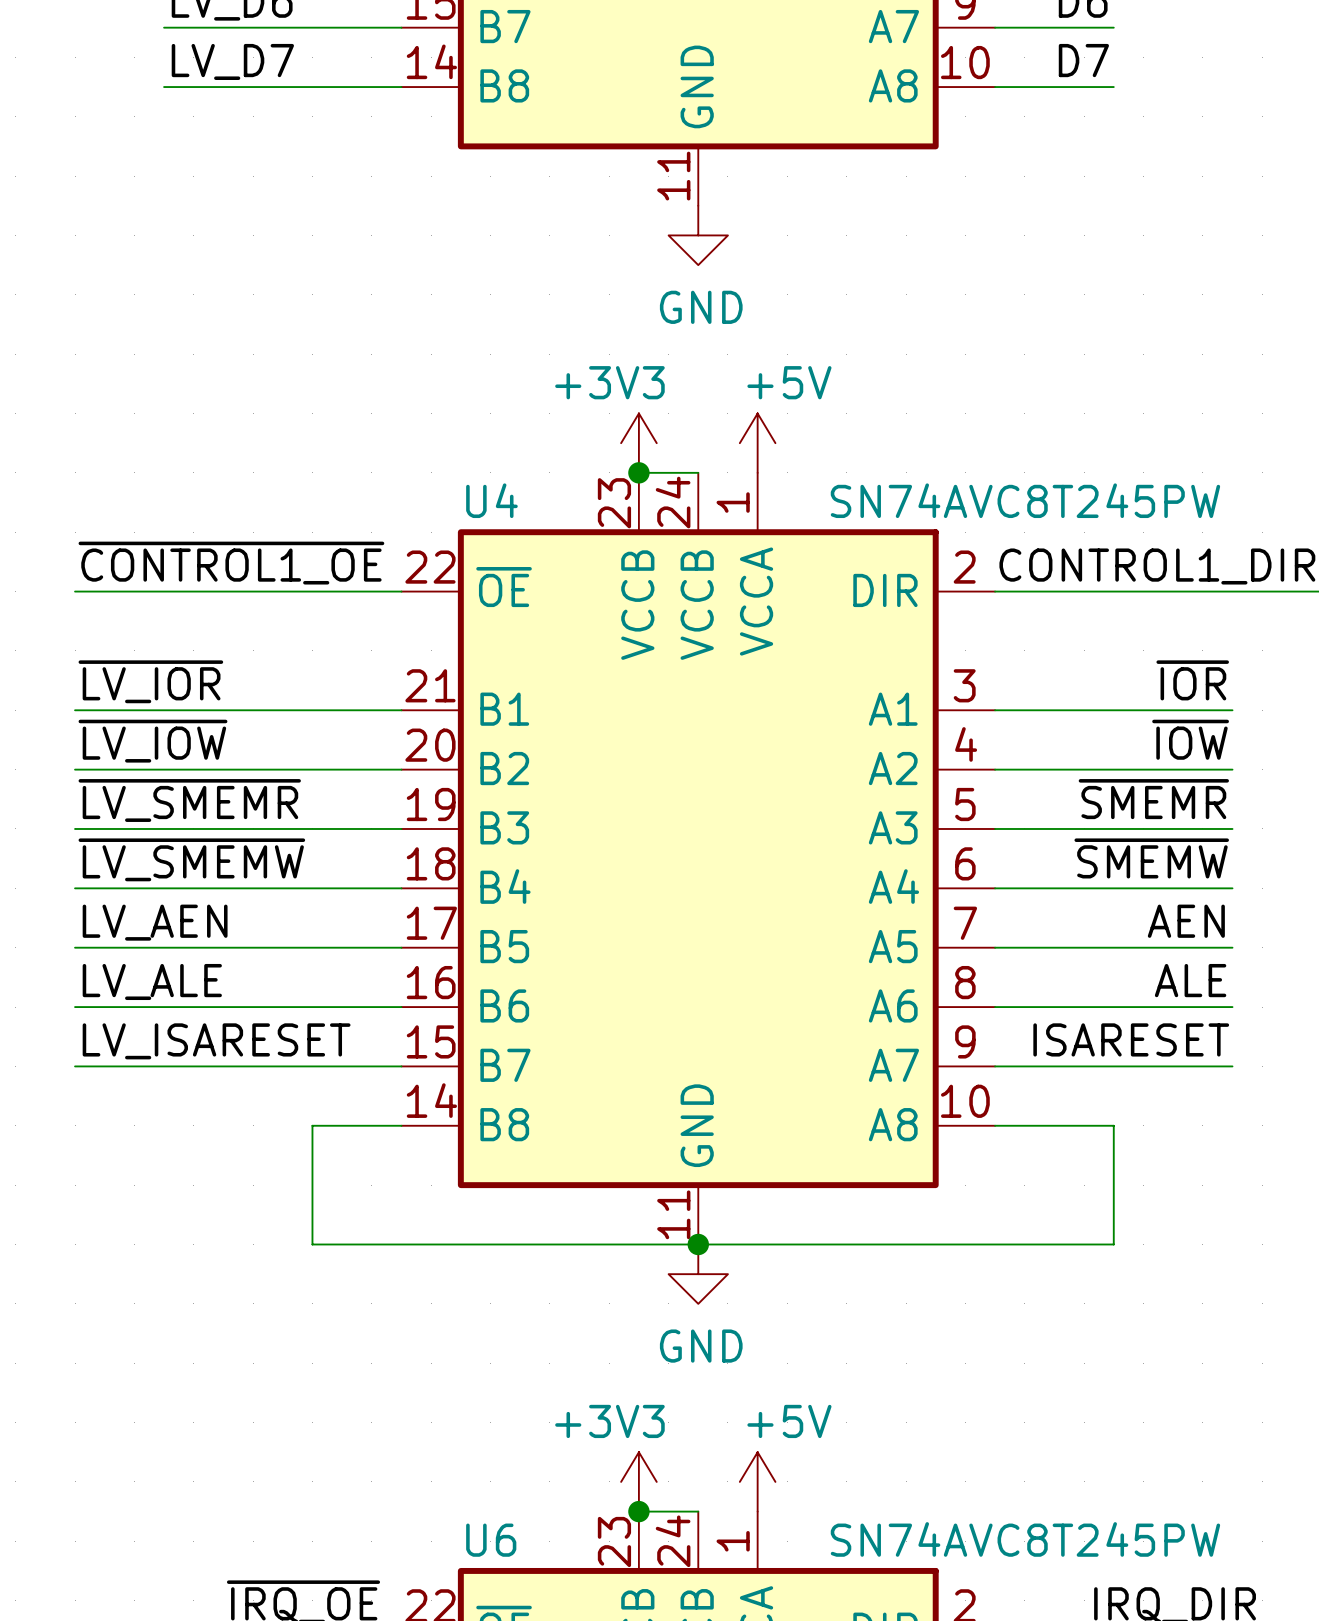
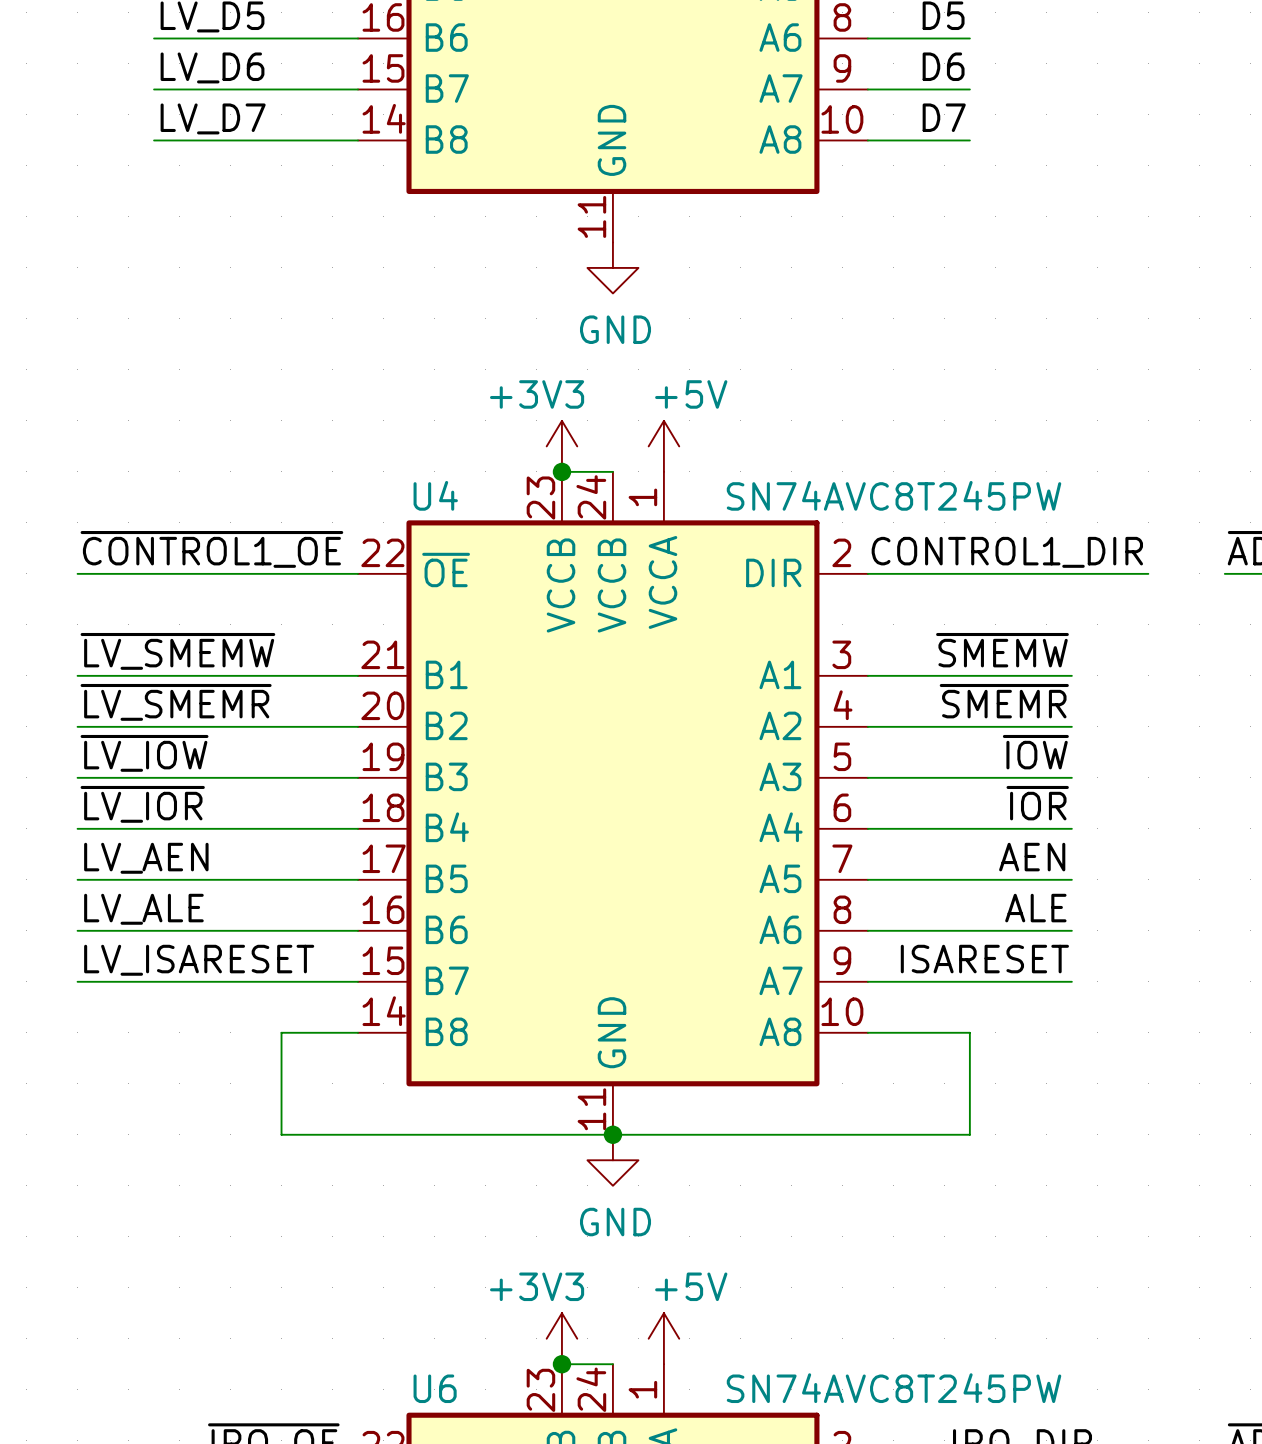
label: ~{IOR} (1192, 680) -> ~{SMEMW} (1002, 650)
label: ~{LV_IOR} (150, 681) -> ~{LV_SMEMW} (177, 651)
label: ~{IOW} (1190, 739) -> ~{SMEMR} (1004, 701)
label: ~{LV_IOW} (152, 741) -> ~{LV_SMEMR} (176, 702)
label: ~{SMEMR} (1153, 799) -> ~{IOW} (1035, 752)
label: ~{LV_SMEMR} (189, 800) -> ~{LV_IOW} (144, 753)
label: ~{SMEMW} (1151, 858) -> ~{IOR} (1037, 803)
label: ~{LV_SMEMW} (191, 859) -> ~{LV_IOR} (142, 804)

